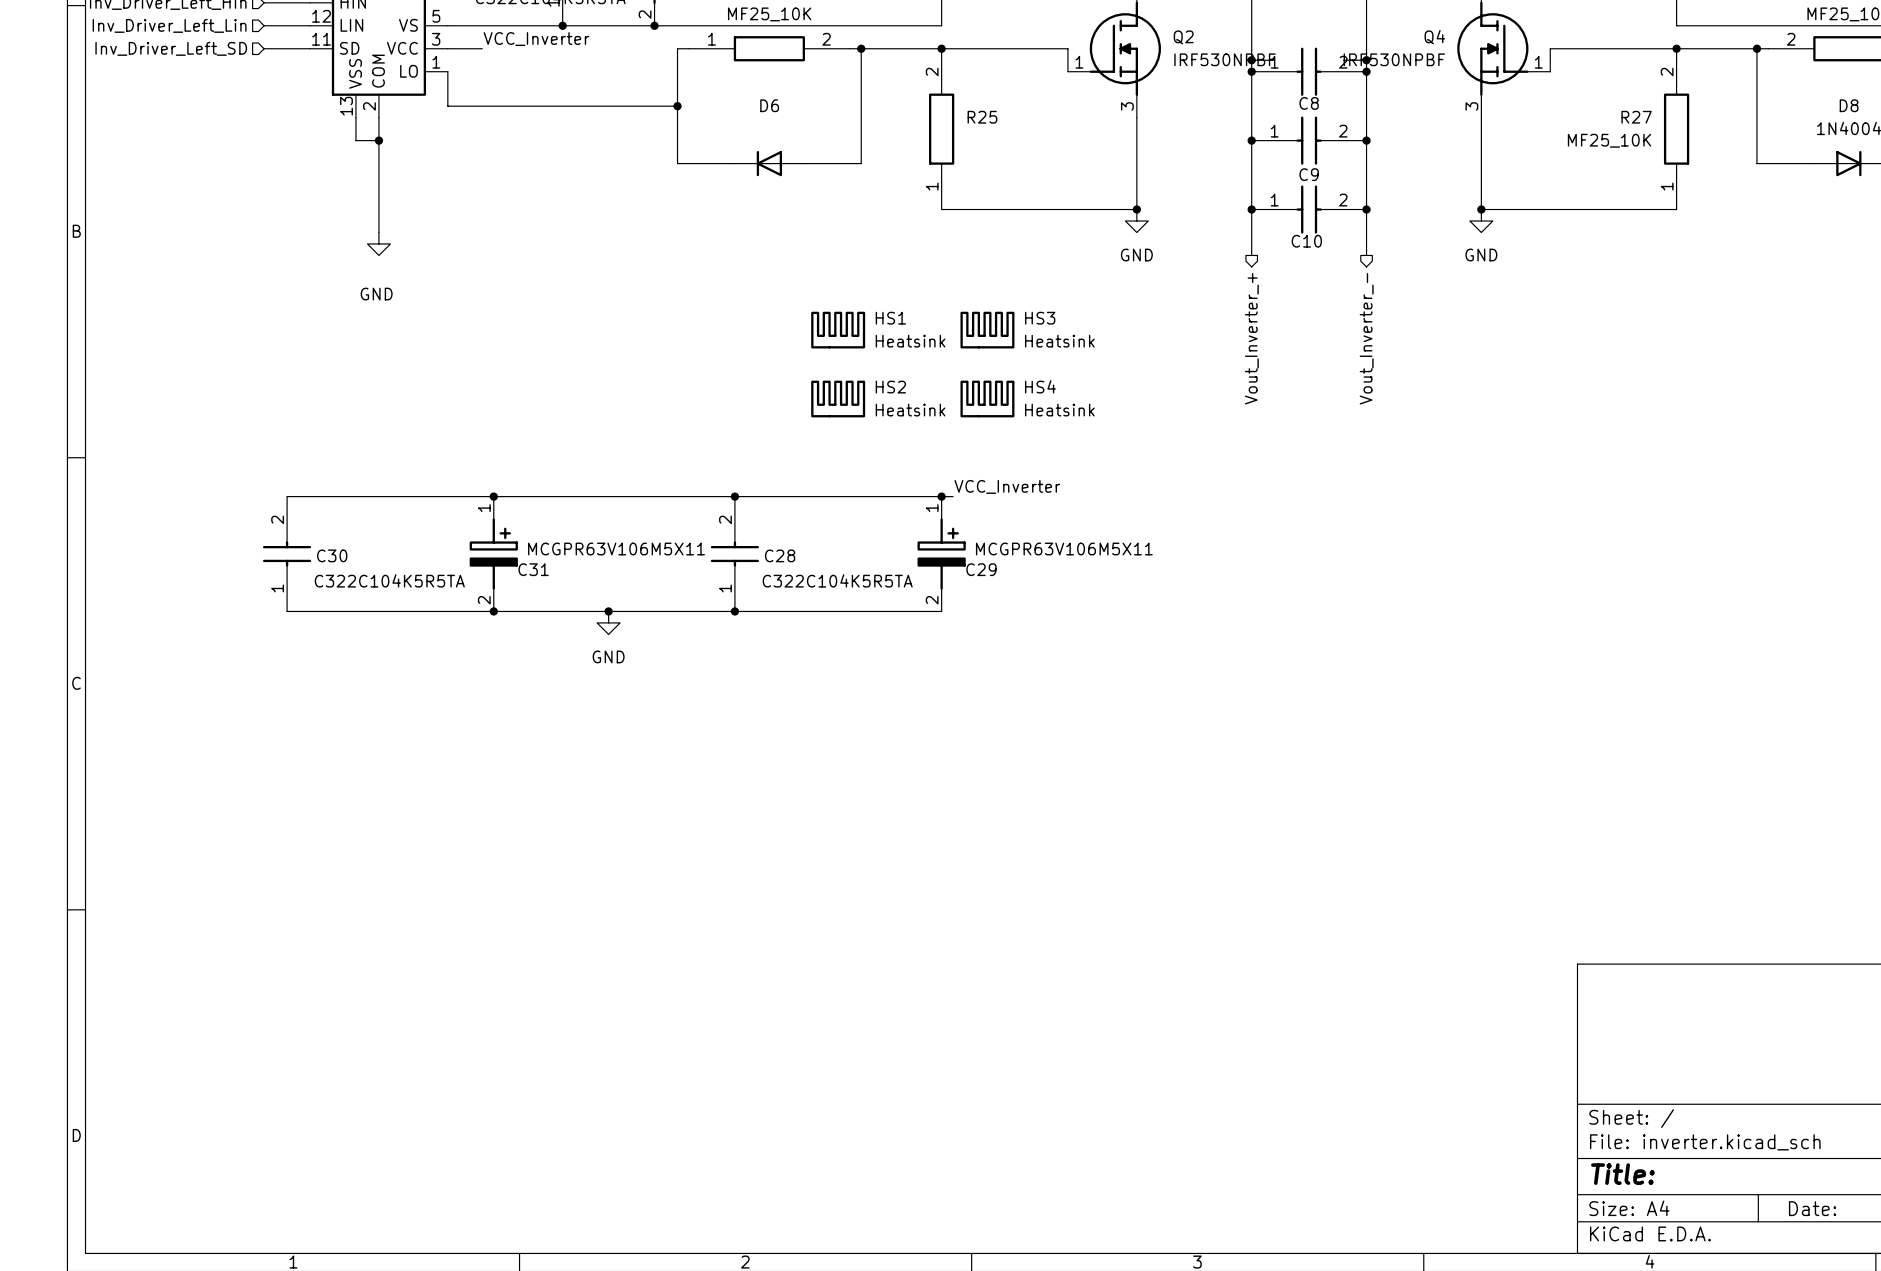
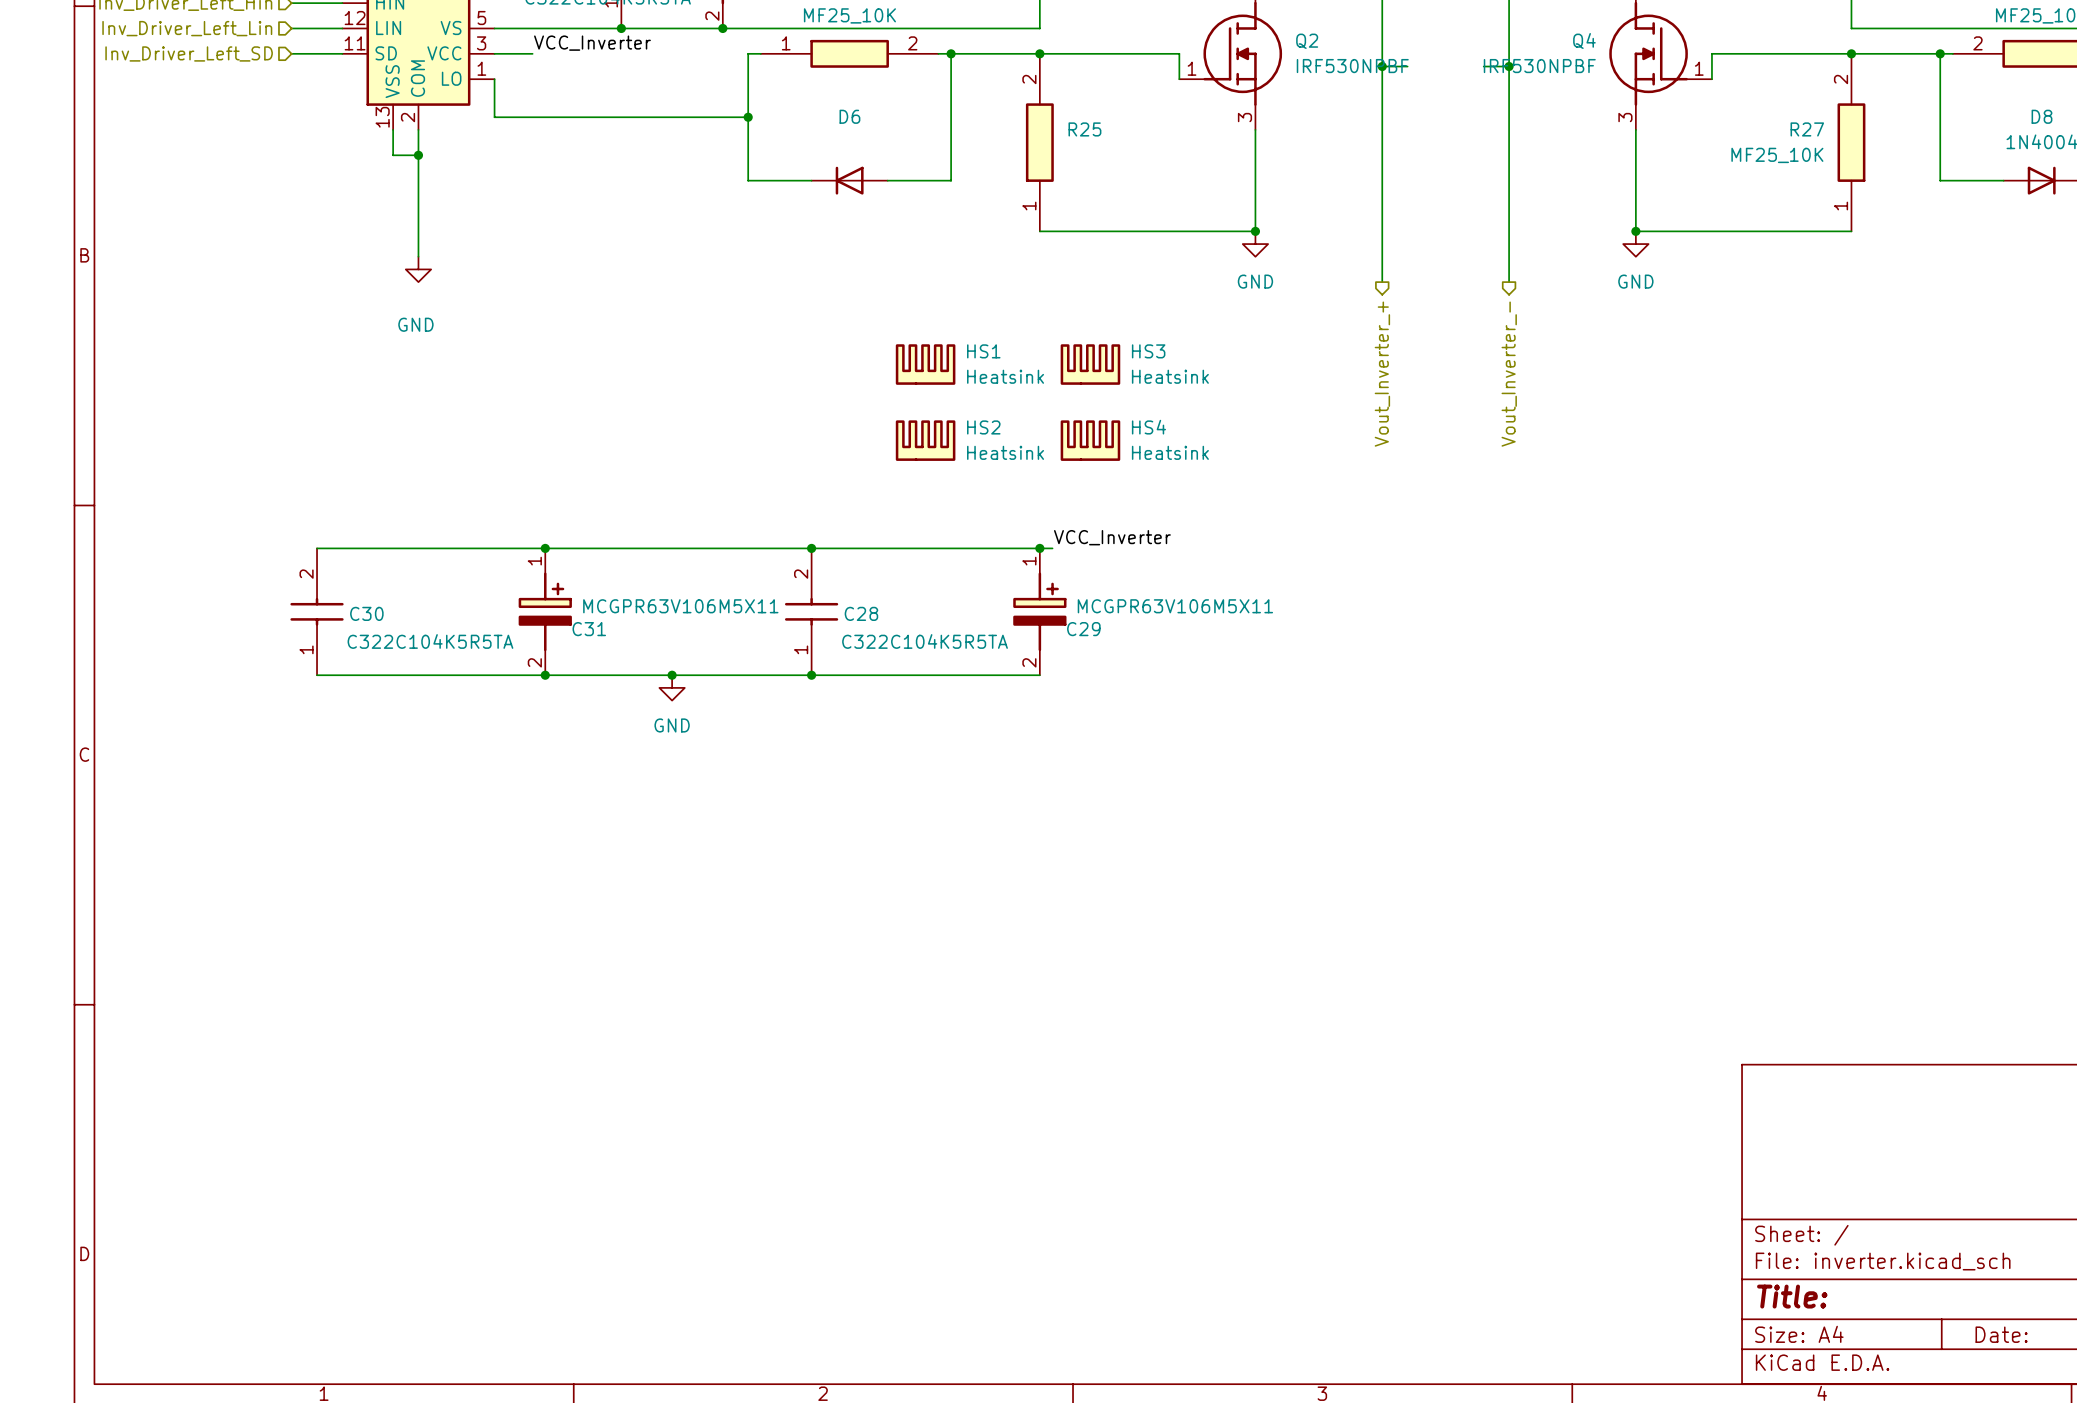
junction: (1251, 71) -> none
C8: (1309, 71) -> none
junction: (1366, 71) -> none
junction: (1251, 140) -> none
C9: (1309, 140) -> none
junction: (1366, 140) -> none
junction: (1251, 209) -> none
C10: (1309, 209) -> none
junction: (1366, 209) -> none

